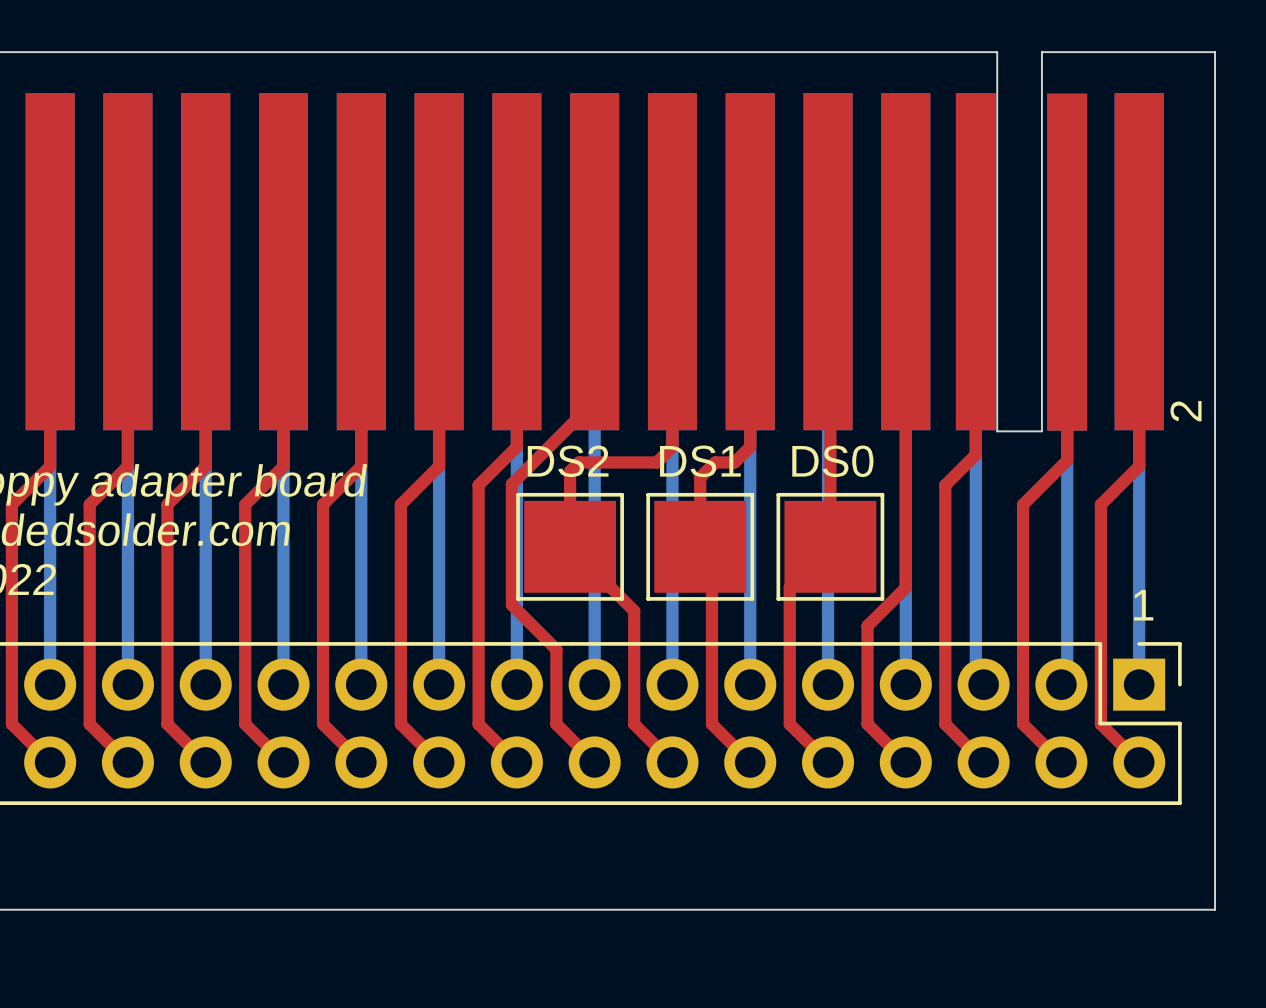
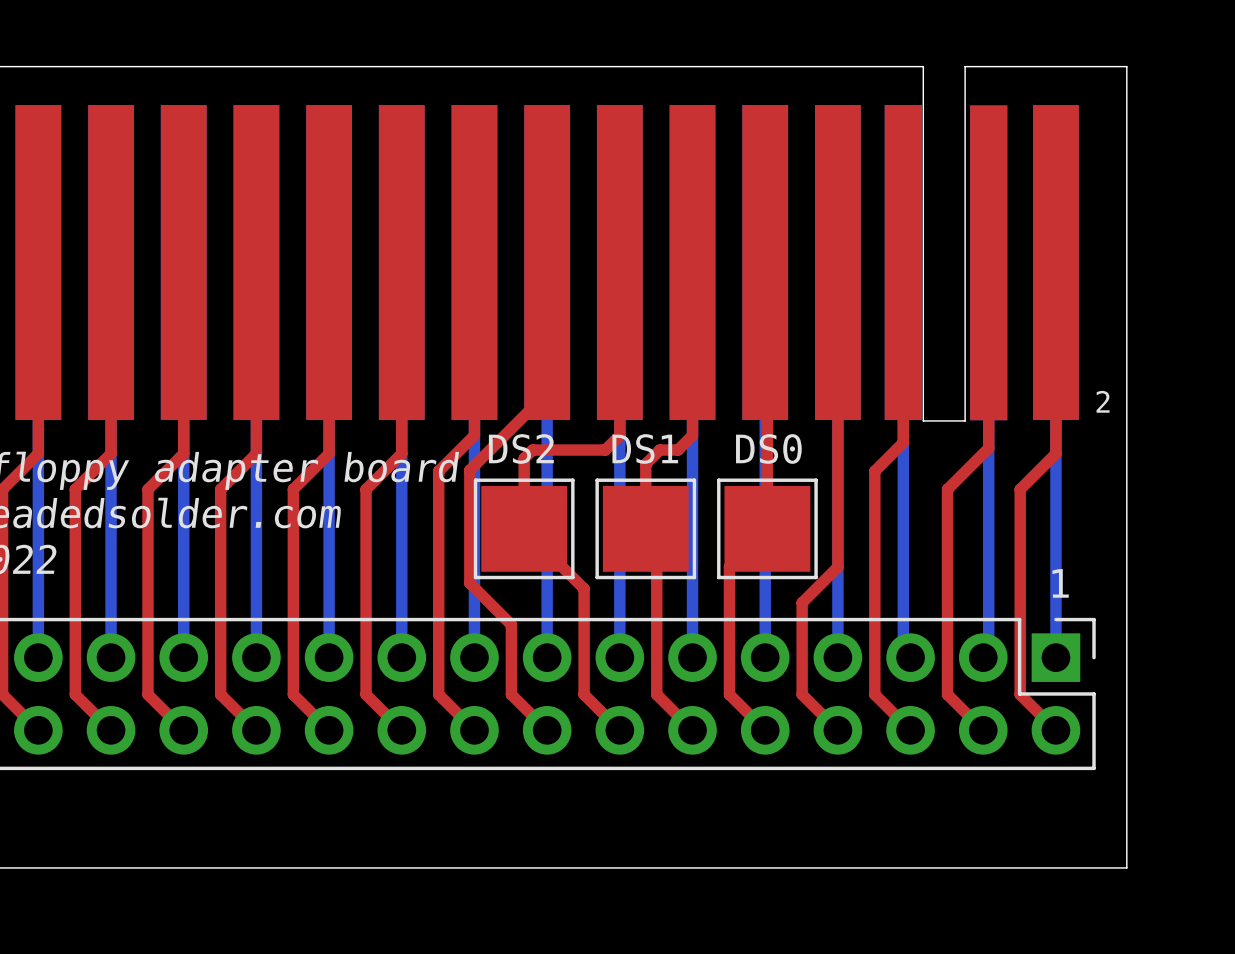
text rotation: 0° (1186, 411) -> 90° clockwise (1103, 401)

